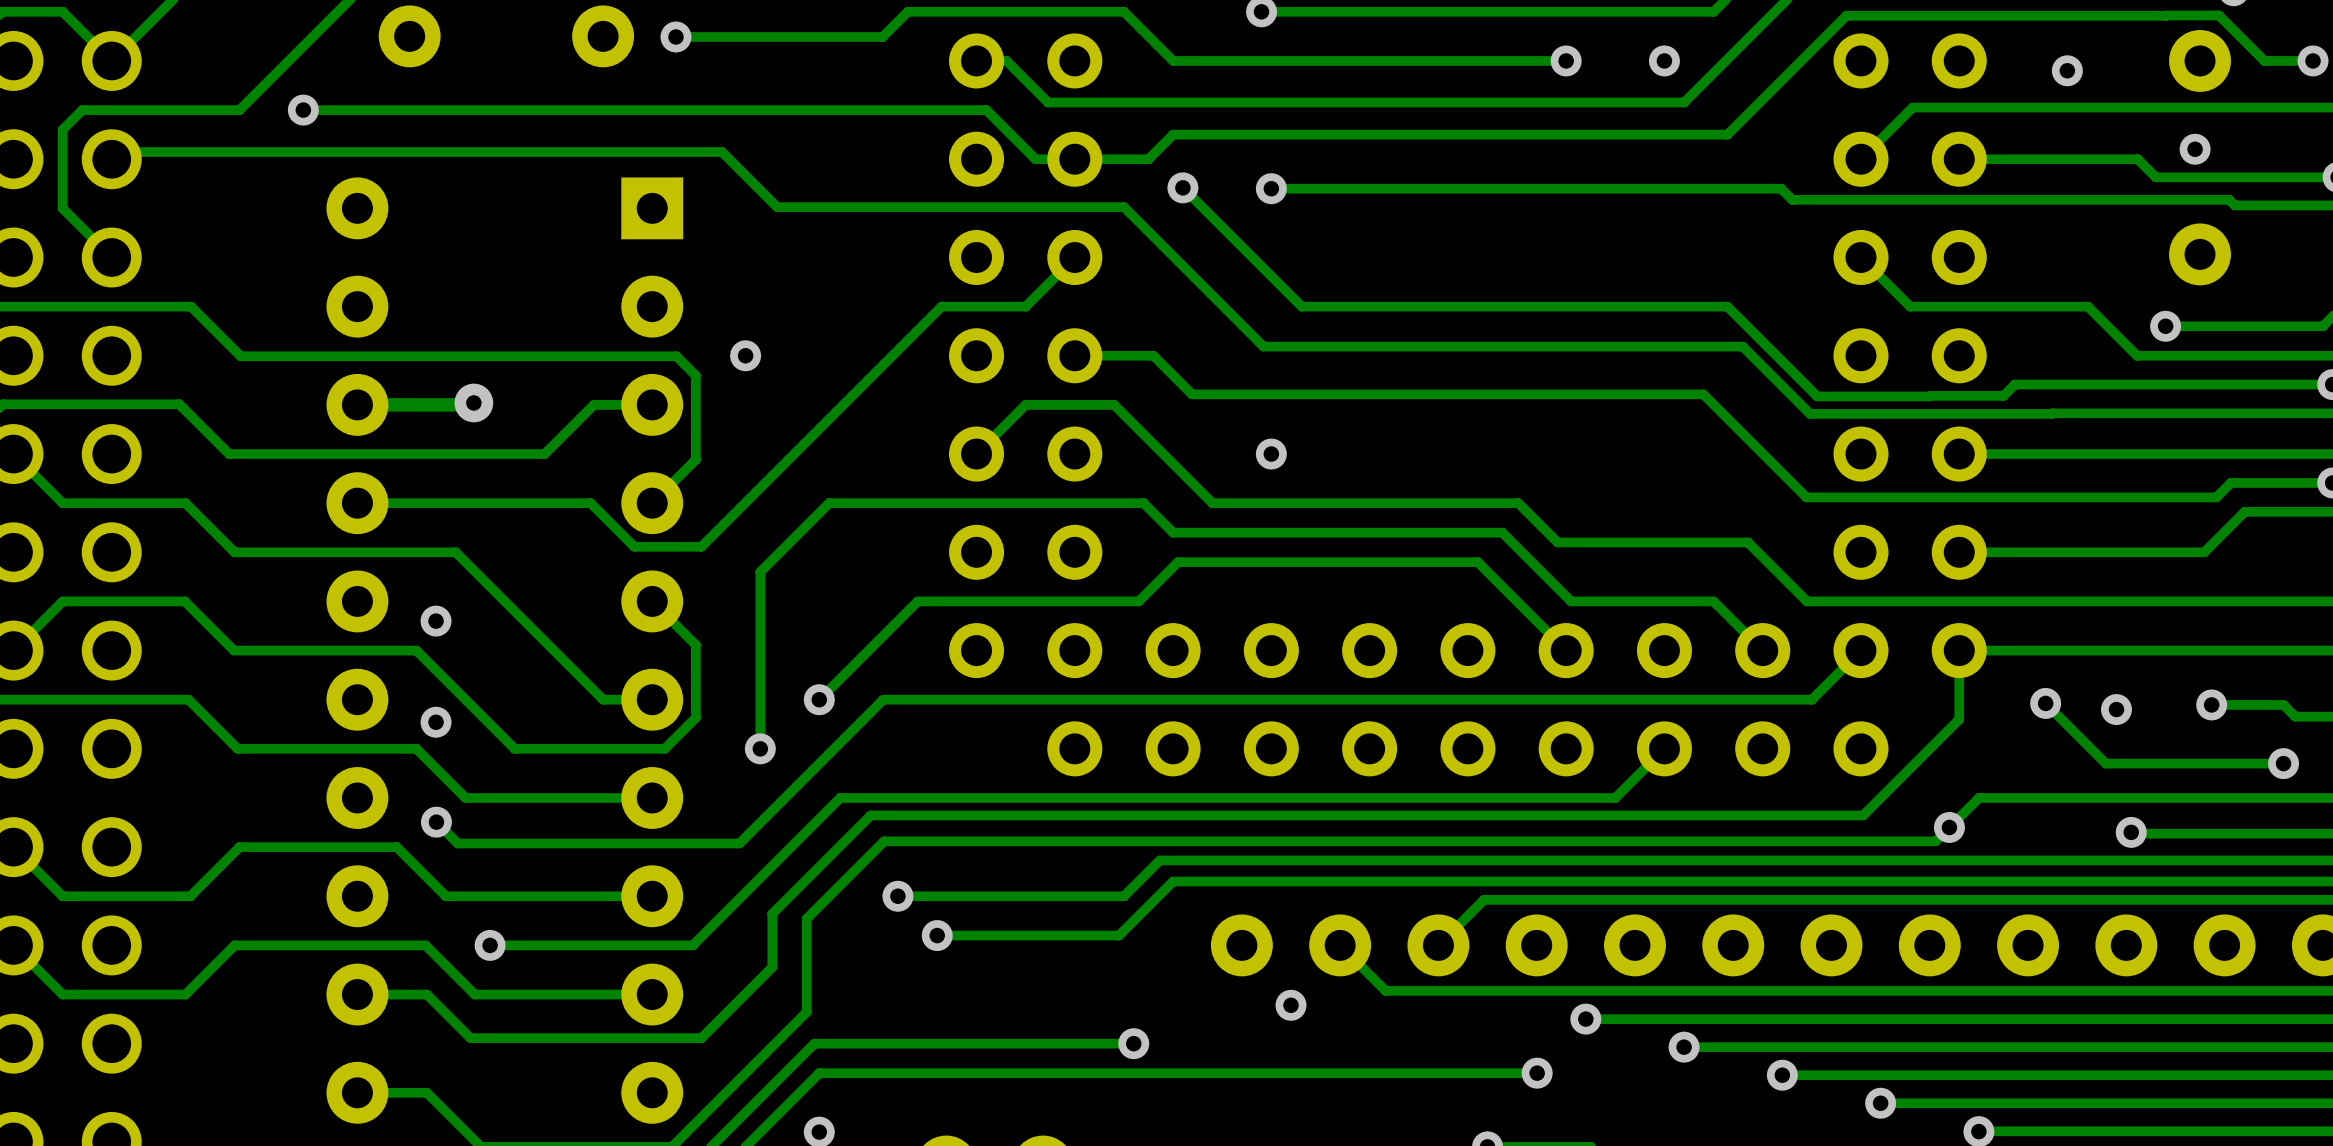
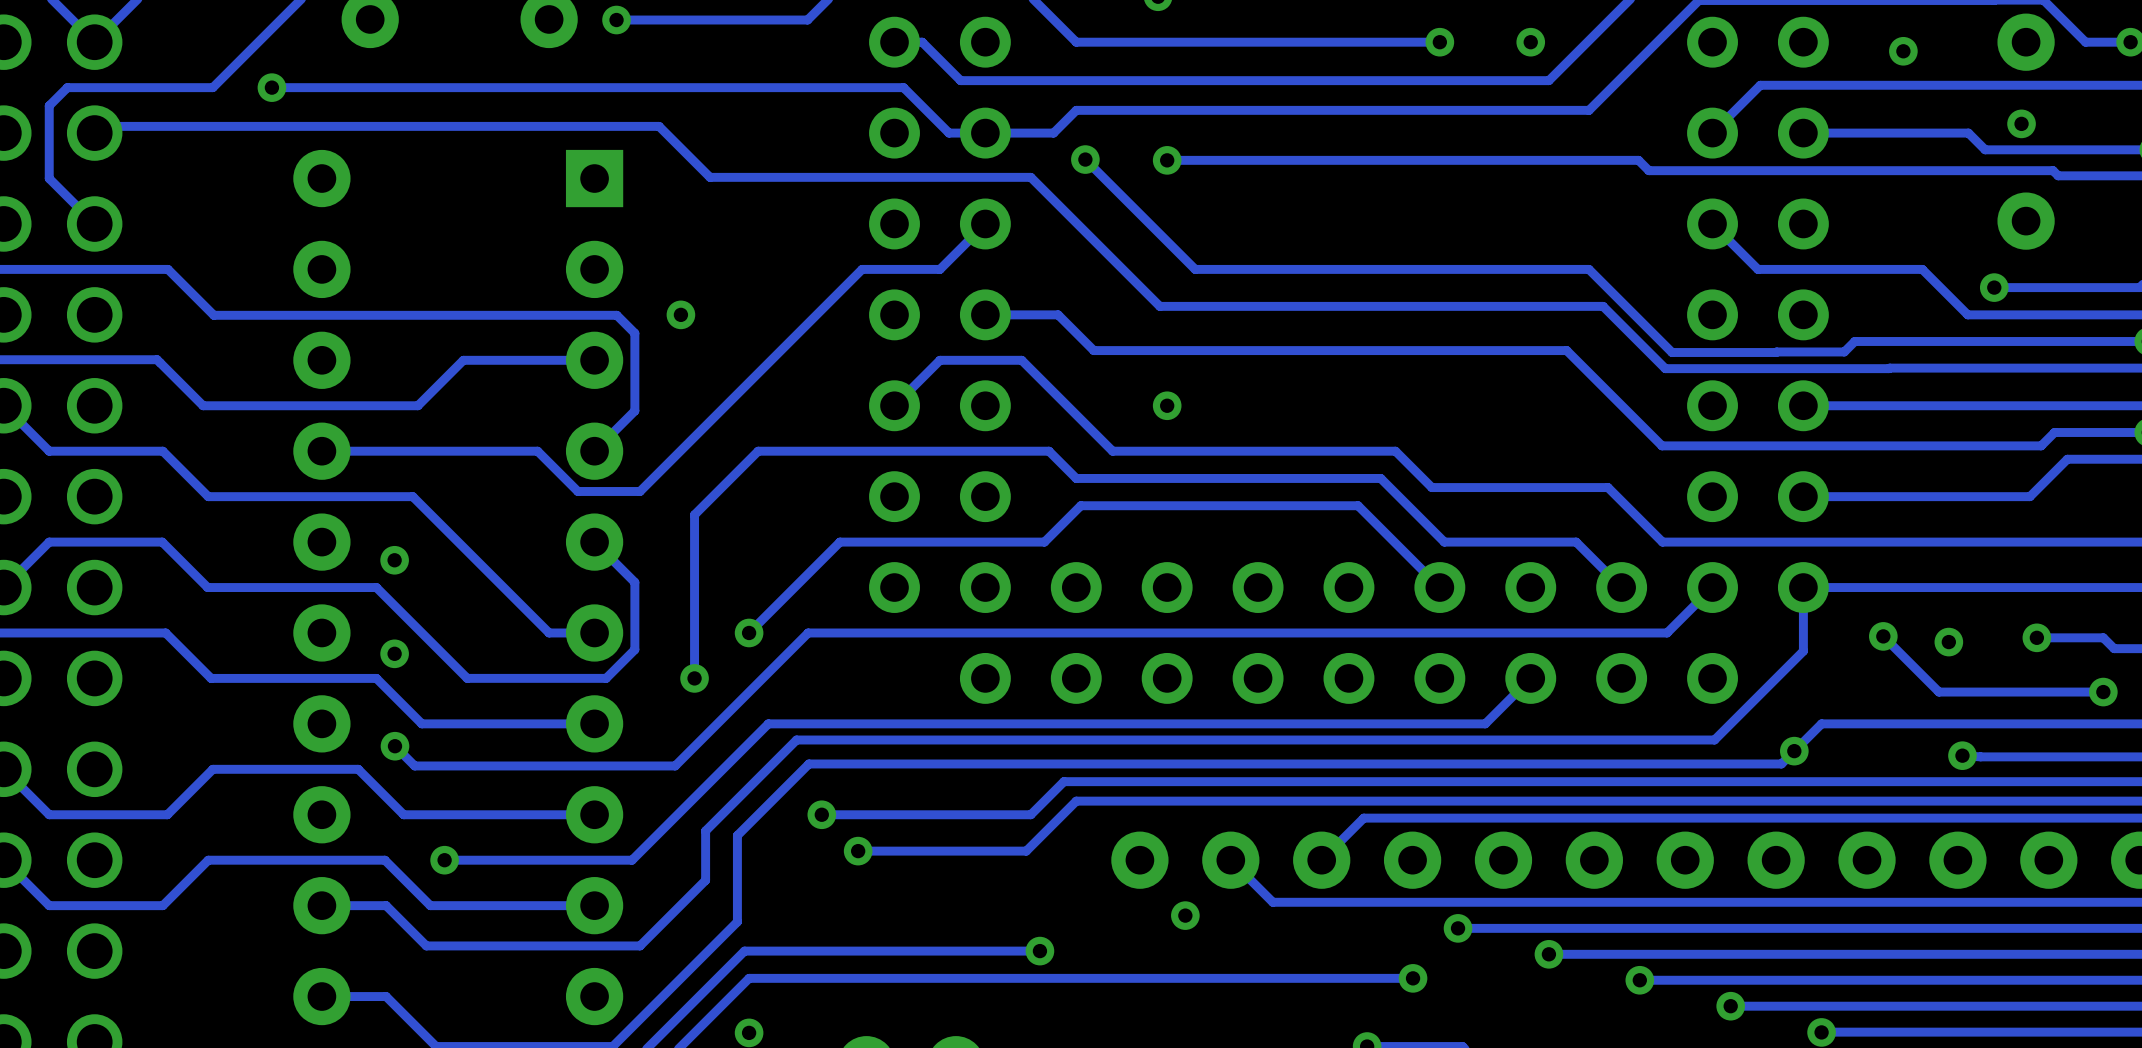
track: (473, 402) (471, 404) (357, 404) -> none
via: (473, 402) -> none
track: (593, 404) (544, 454) (461, 454) -> (540, 360) (463, 360) (417, 405)

